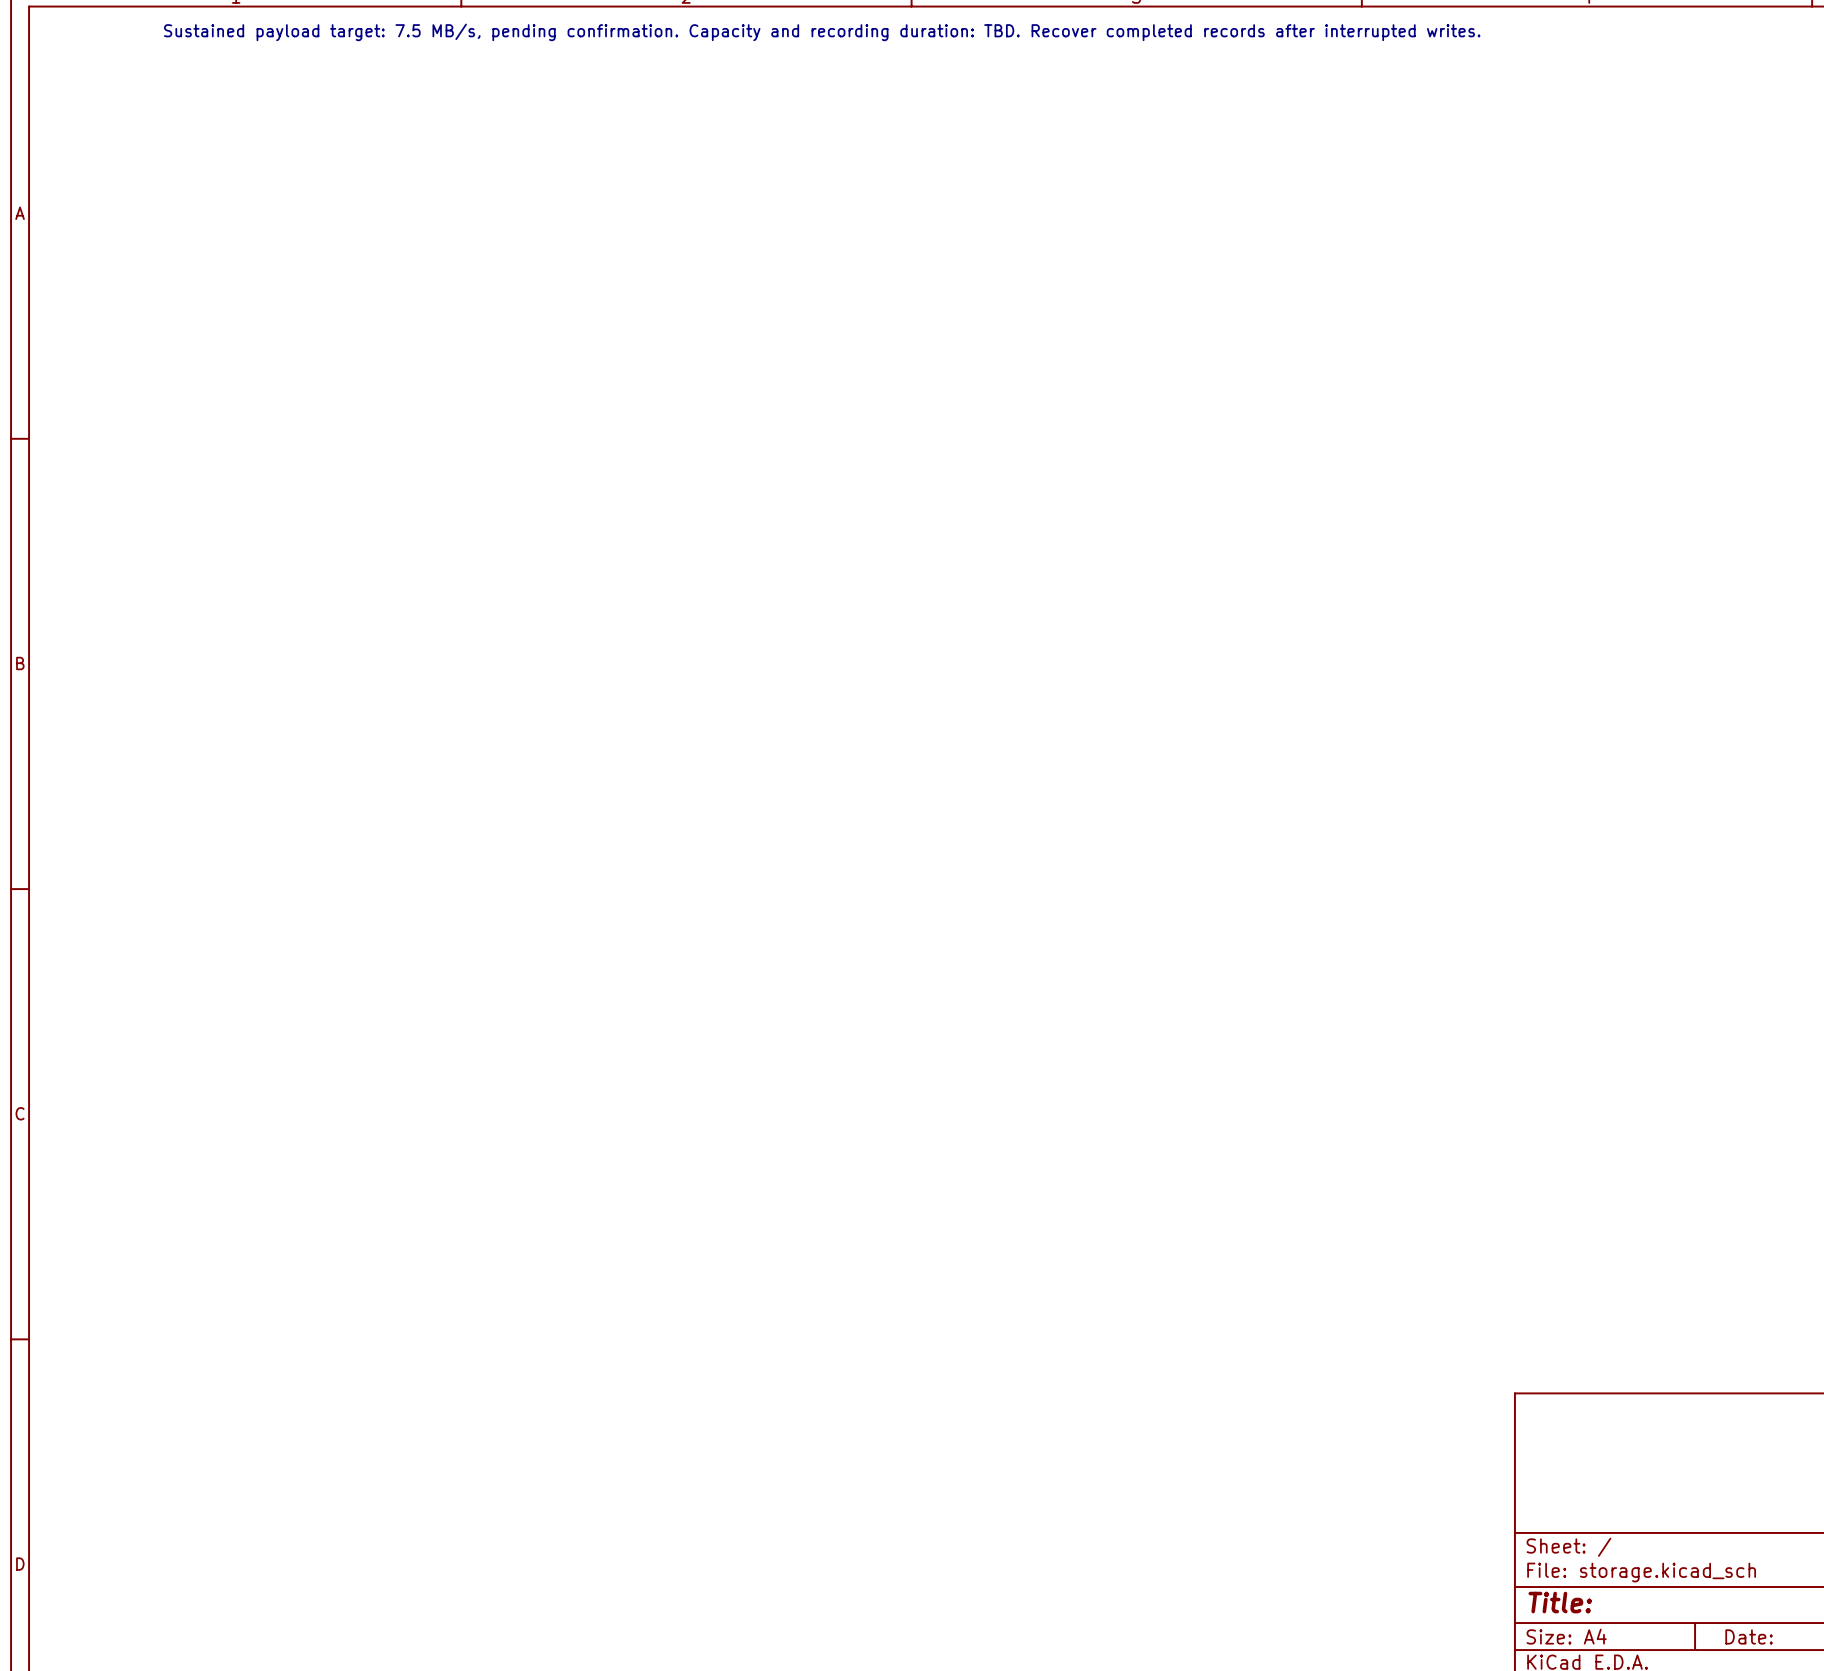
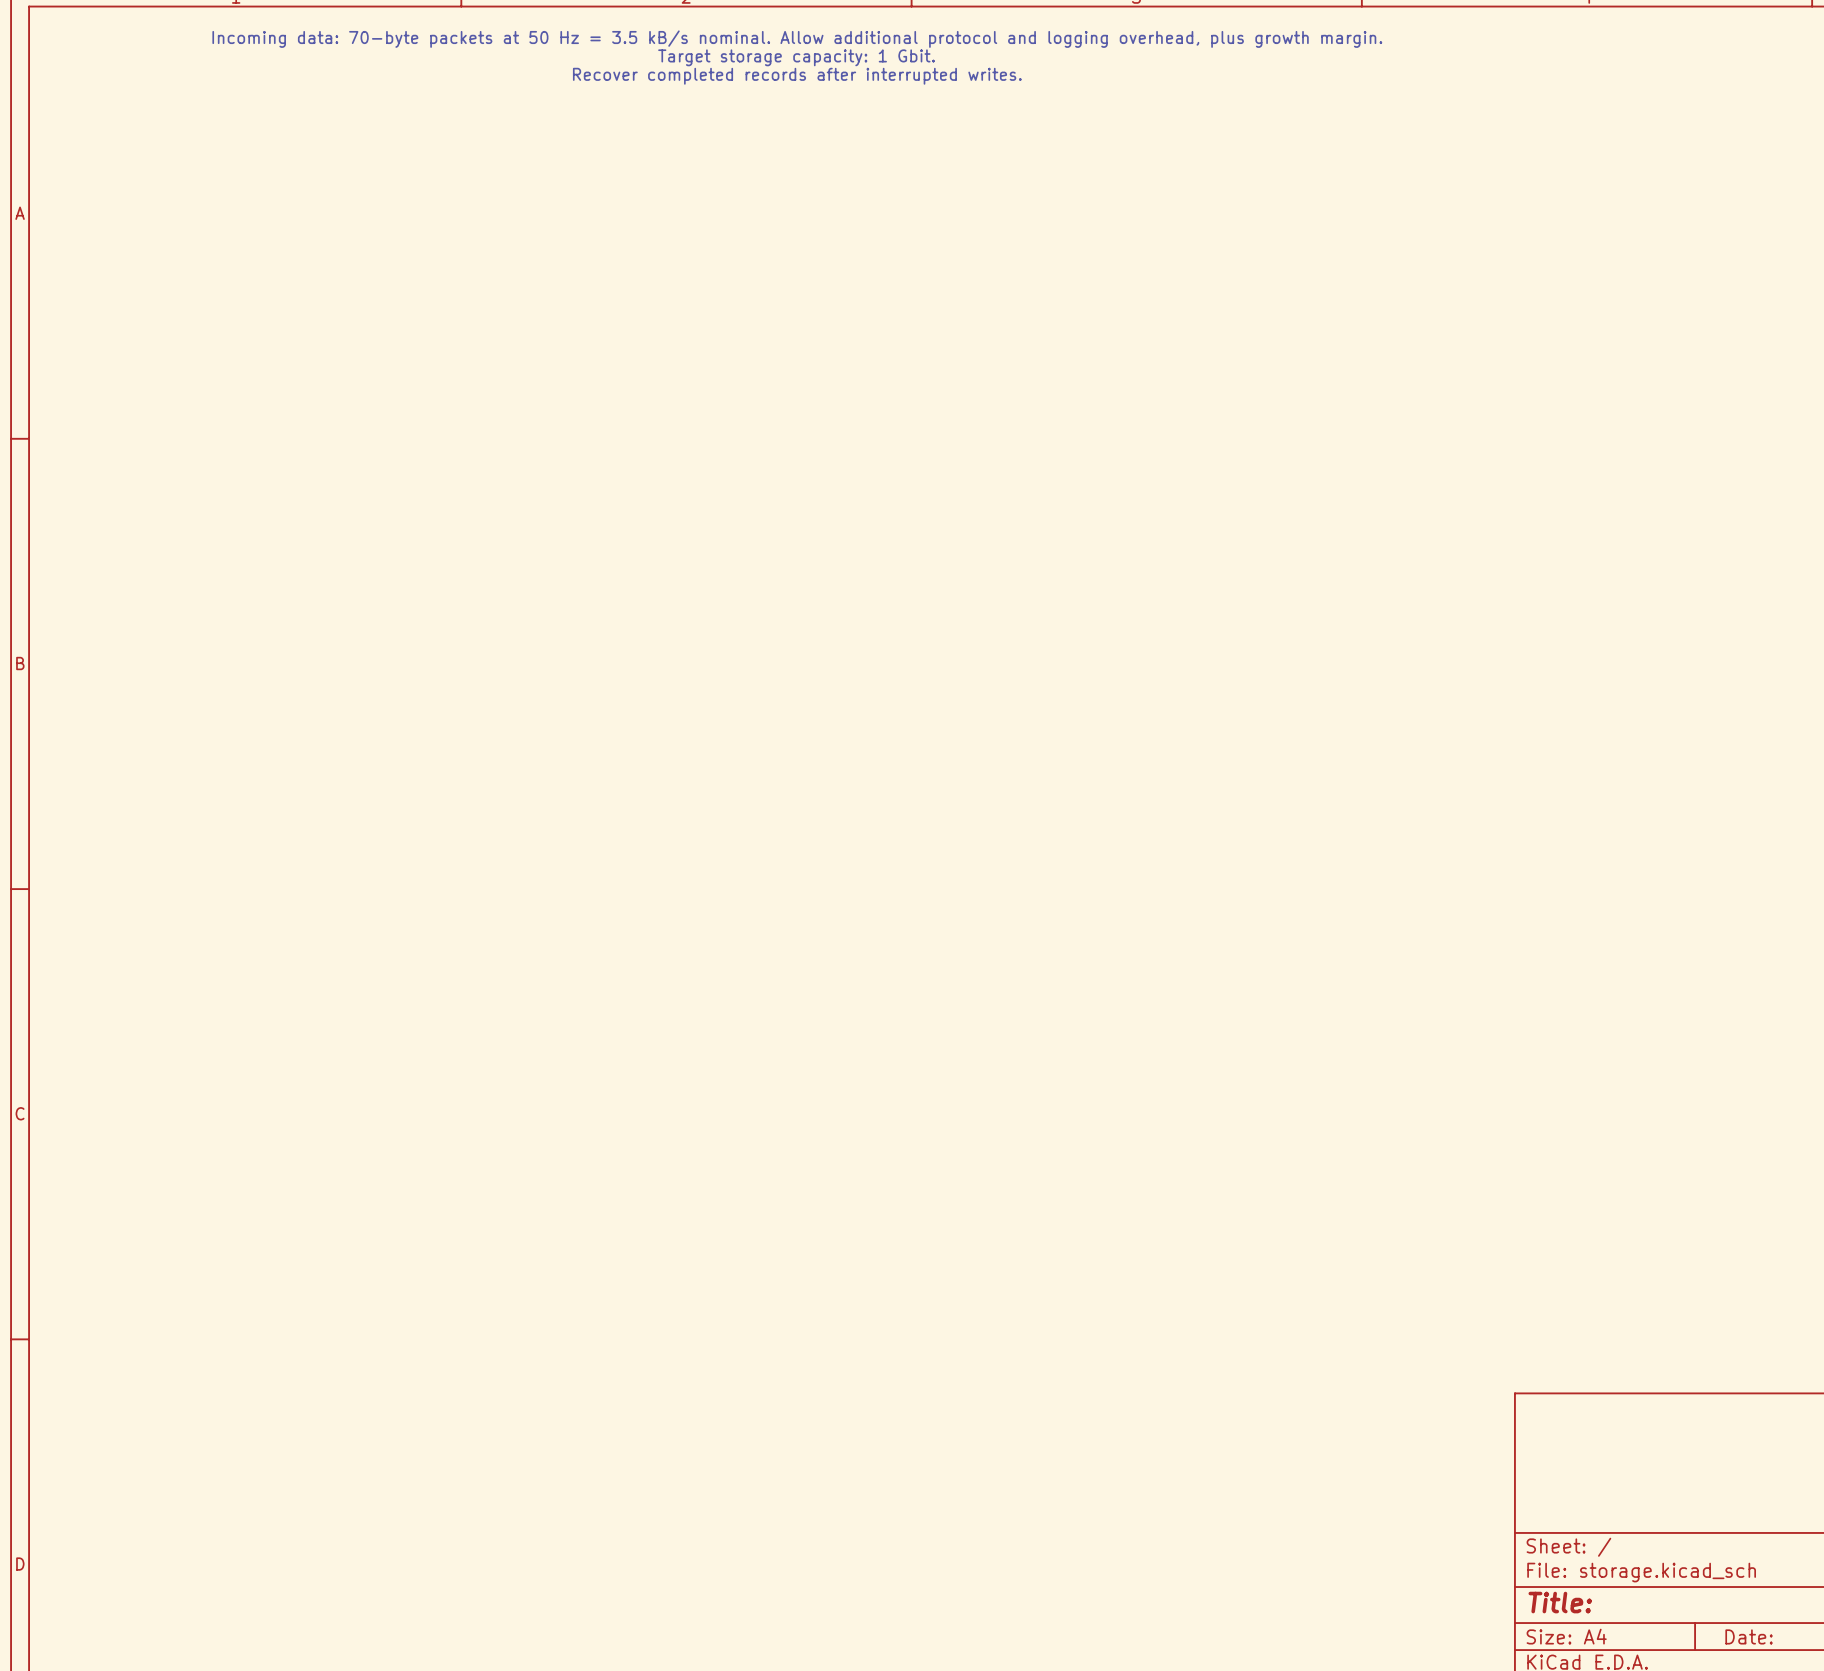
text: Sustained payload target: 7.5 MB/s, pending confirmation. Capacity and recording duration: TBD. Recover completed records after interrupted writes. (822, 32) -> none
text: none -> Incoming data: 70-byte packets at 50 Hz = 3.5 kB/s nominal. Allow additional protocol and logging overhead, plus growth margin. (797, 39)
text: none -> Target storage capacity: 1 Gbit. (796, 57)
text: none -> Recover completed records after interrupted writes. (797, 76)

